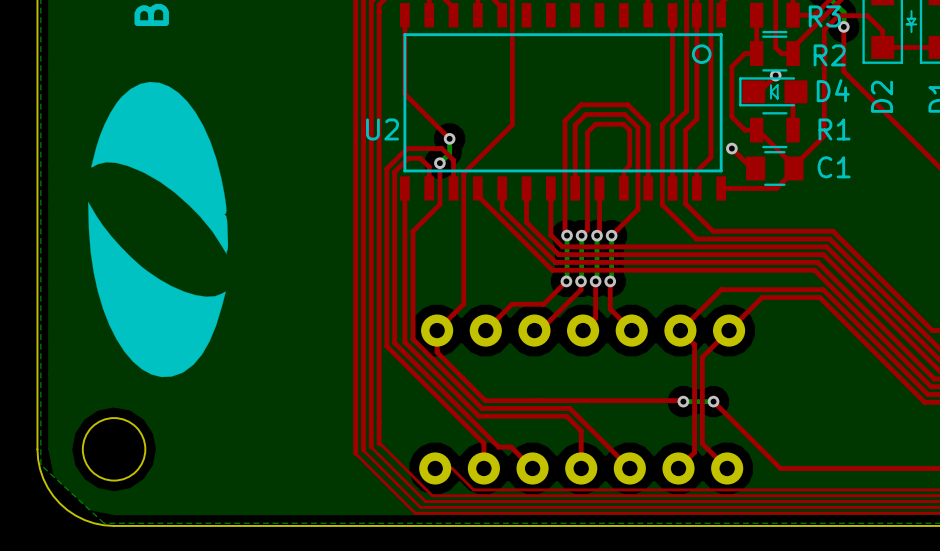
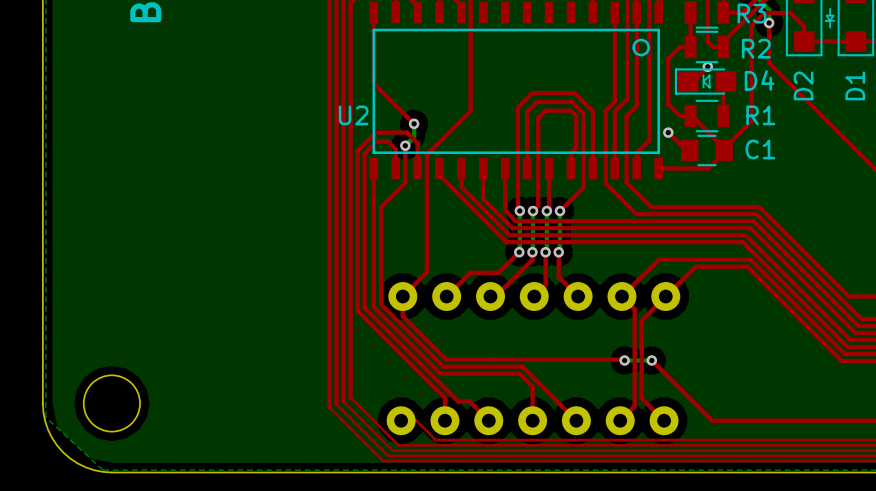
drawing: [88, 81, 229, 378] -> none

